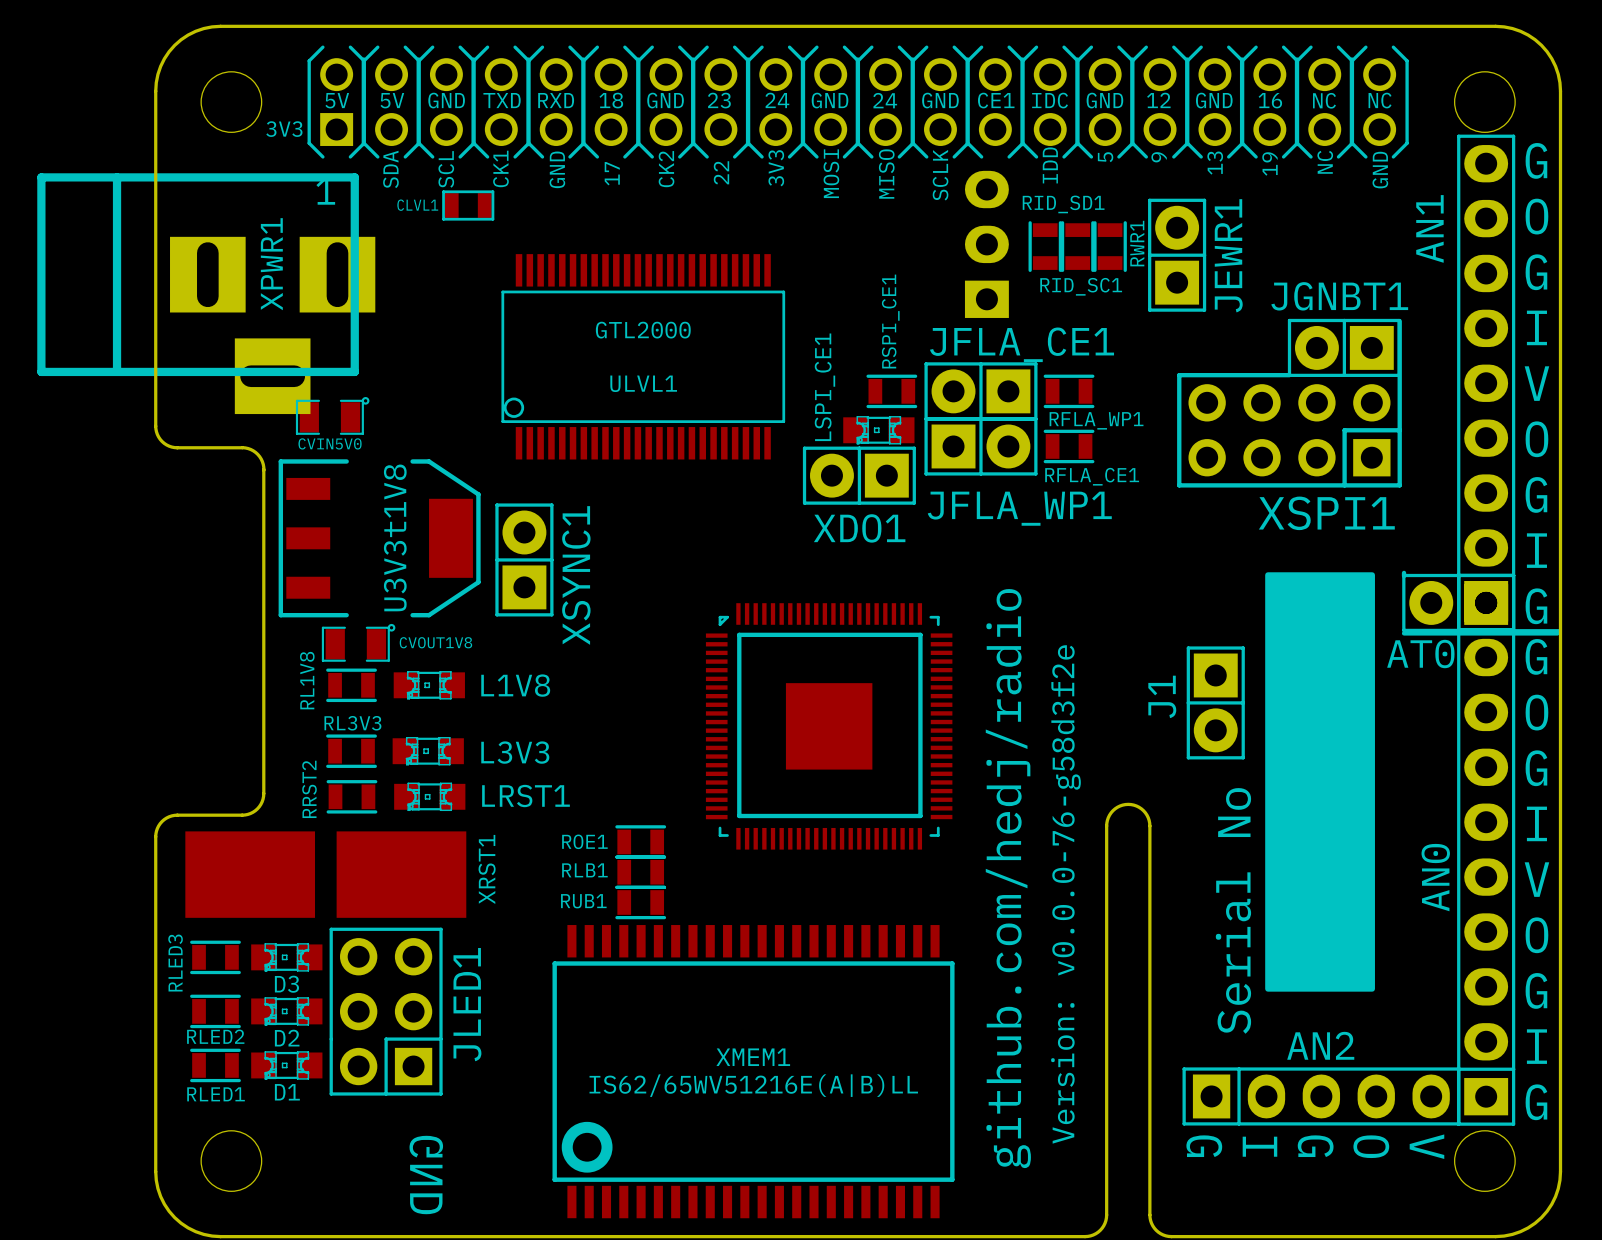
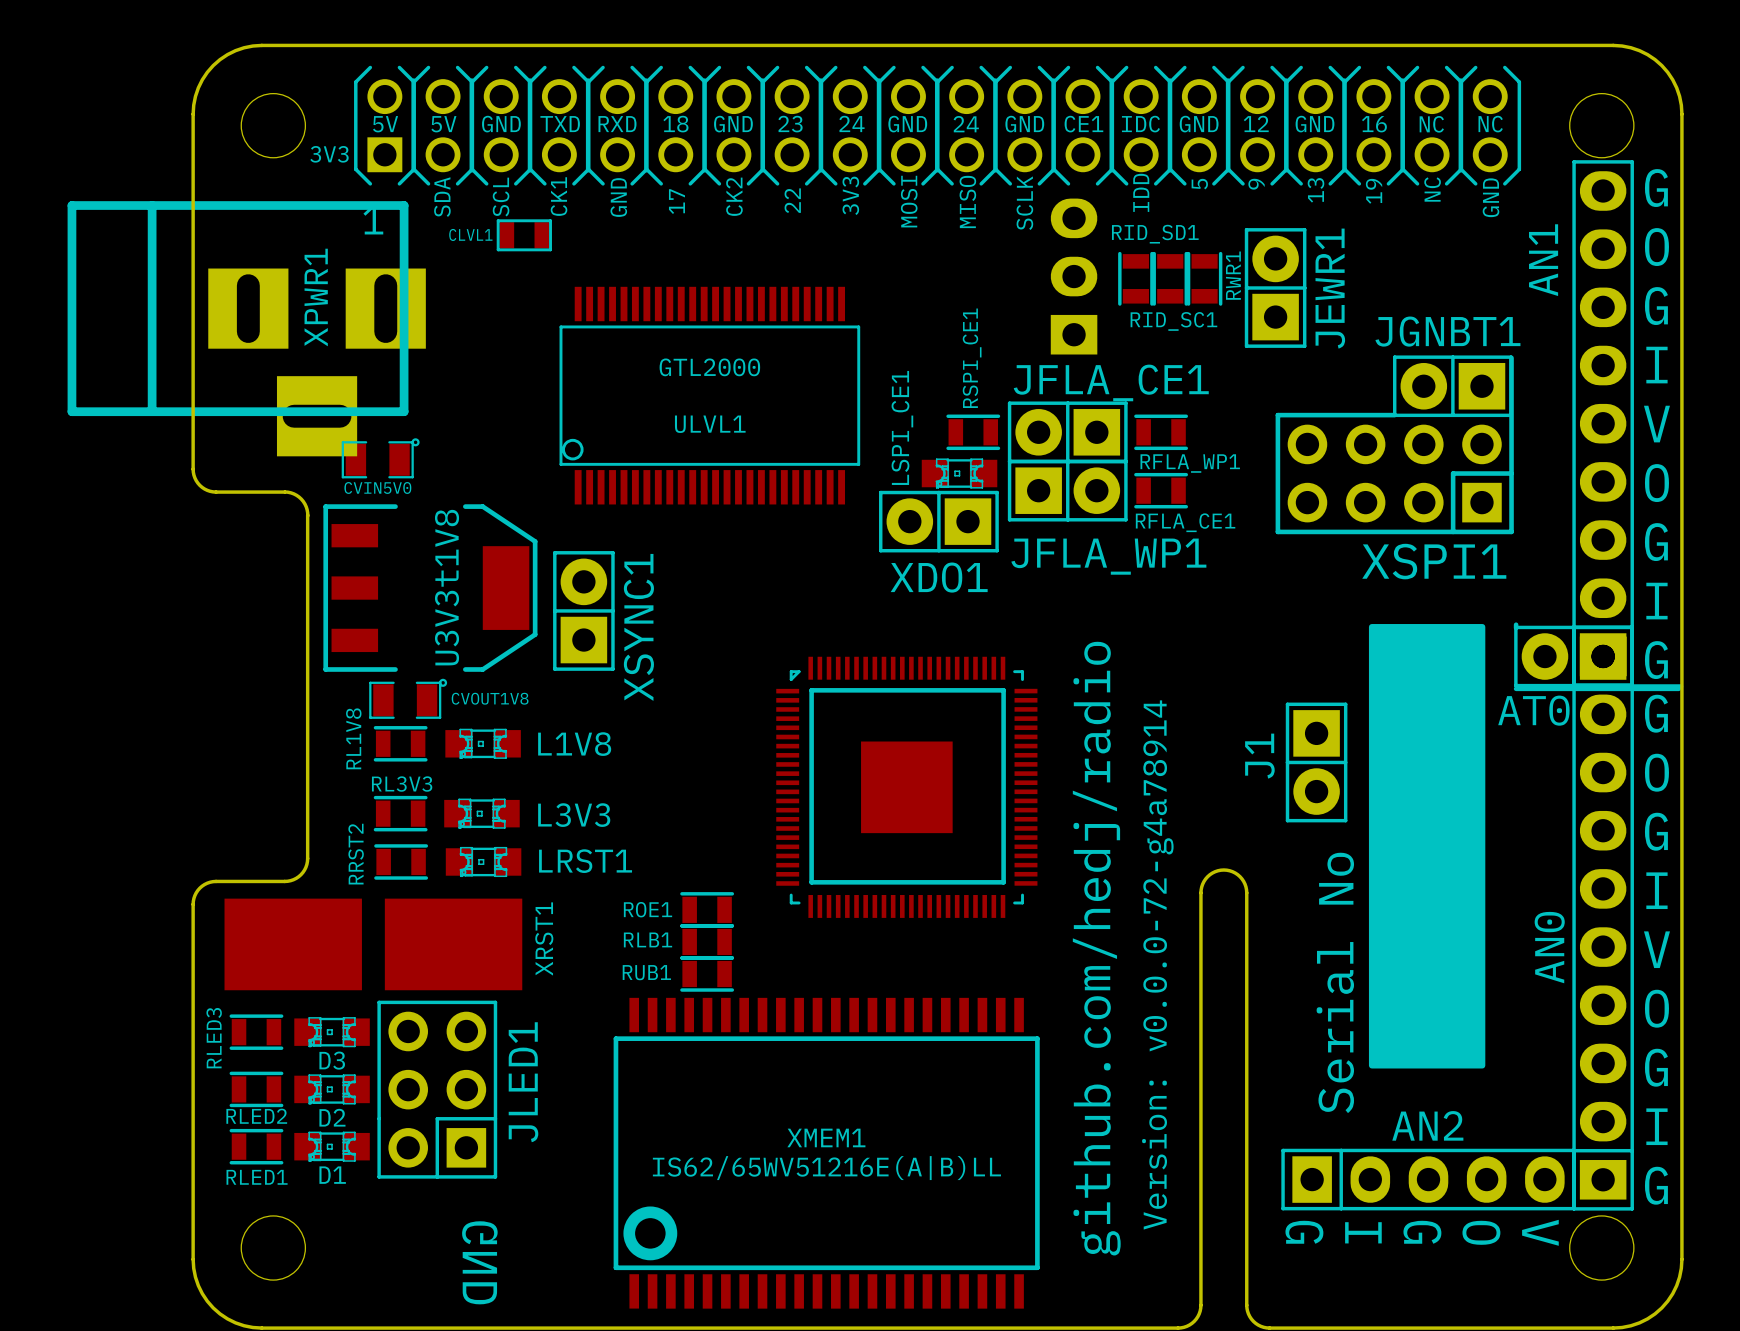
text: Version: v0.0.0-76-g58d3f2e (1065, 894) -> Version: v0.0.0-72-g4a78914 (1157, 964)

